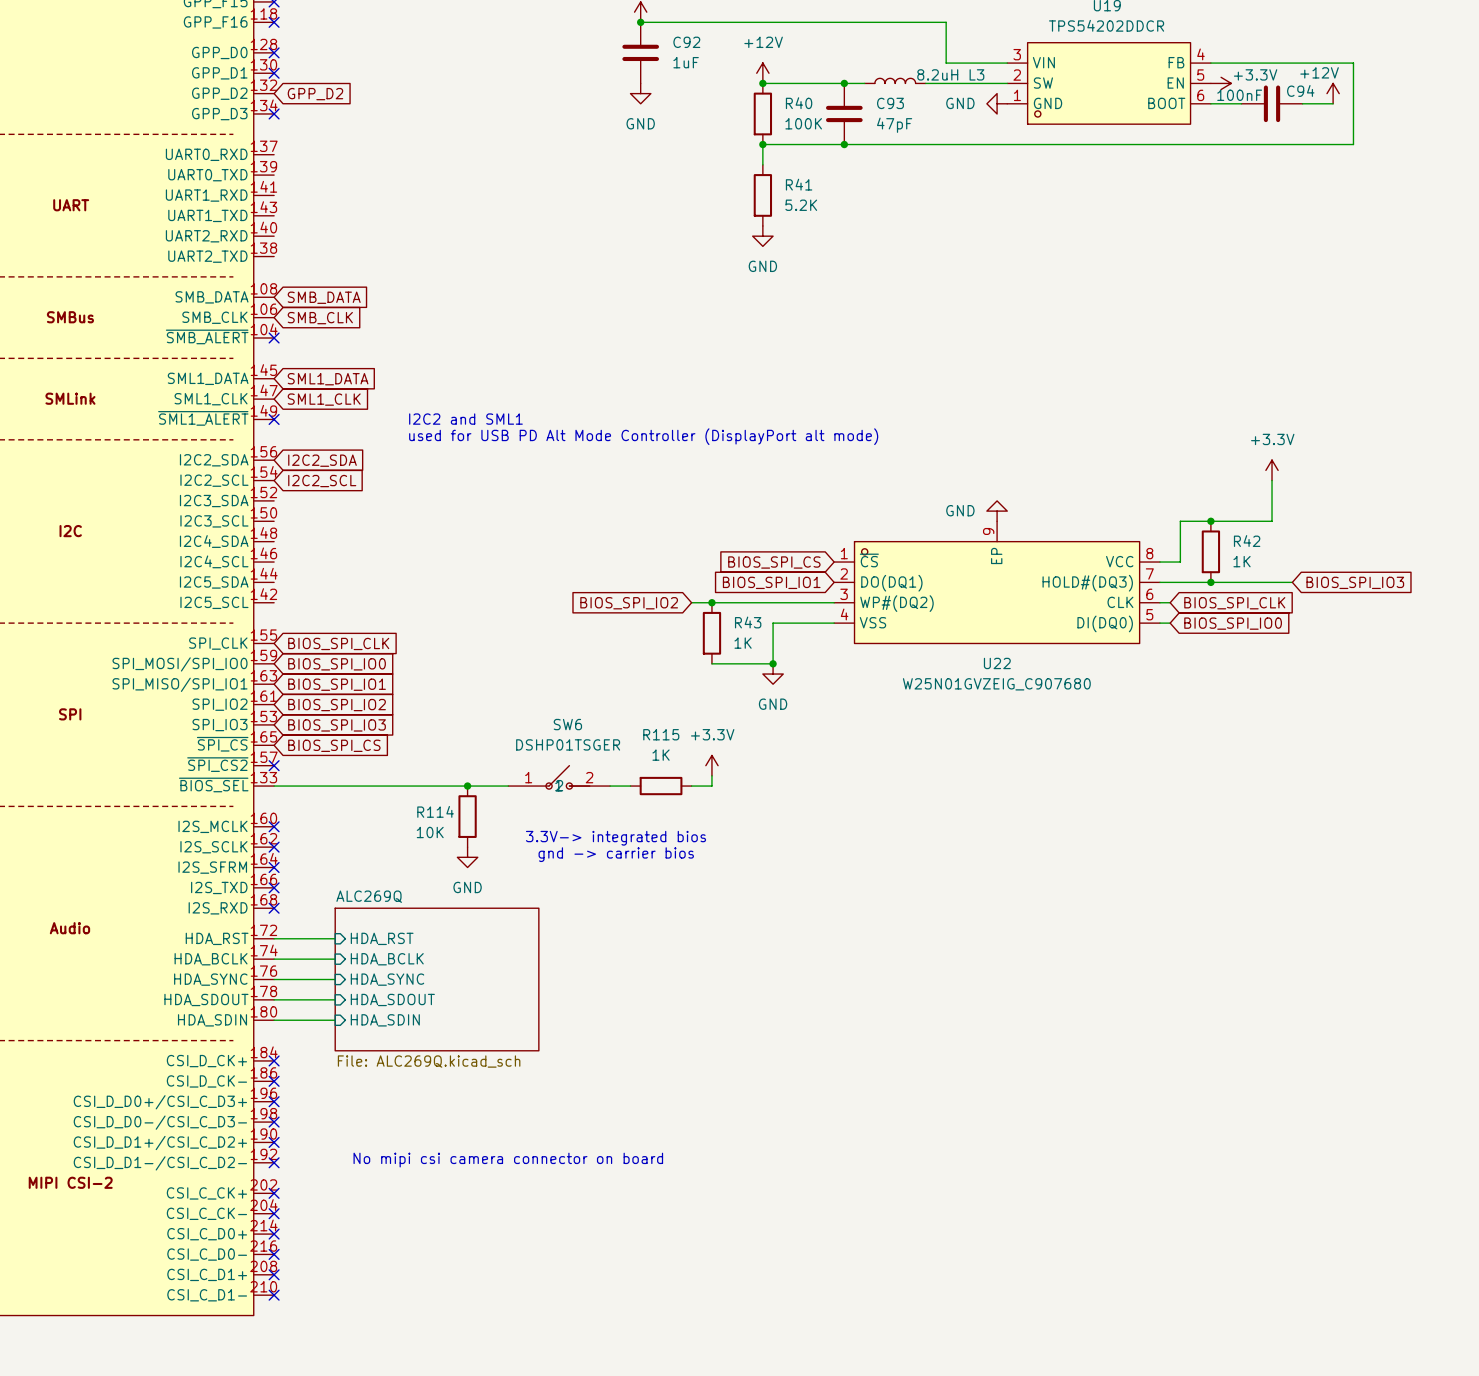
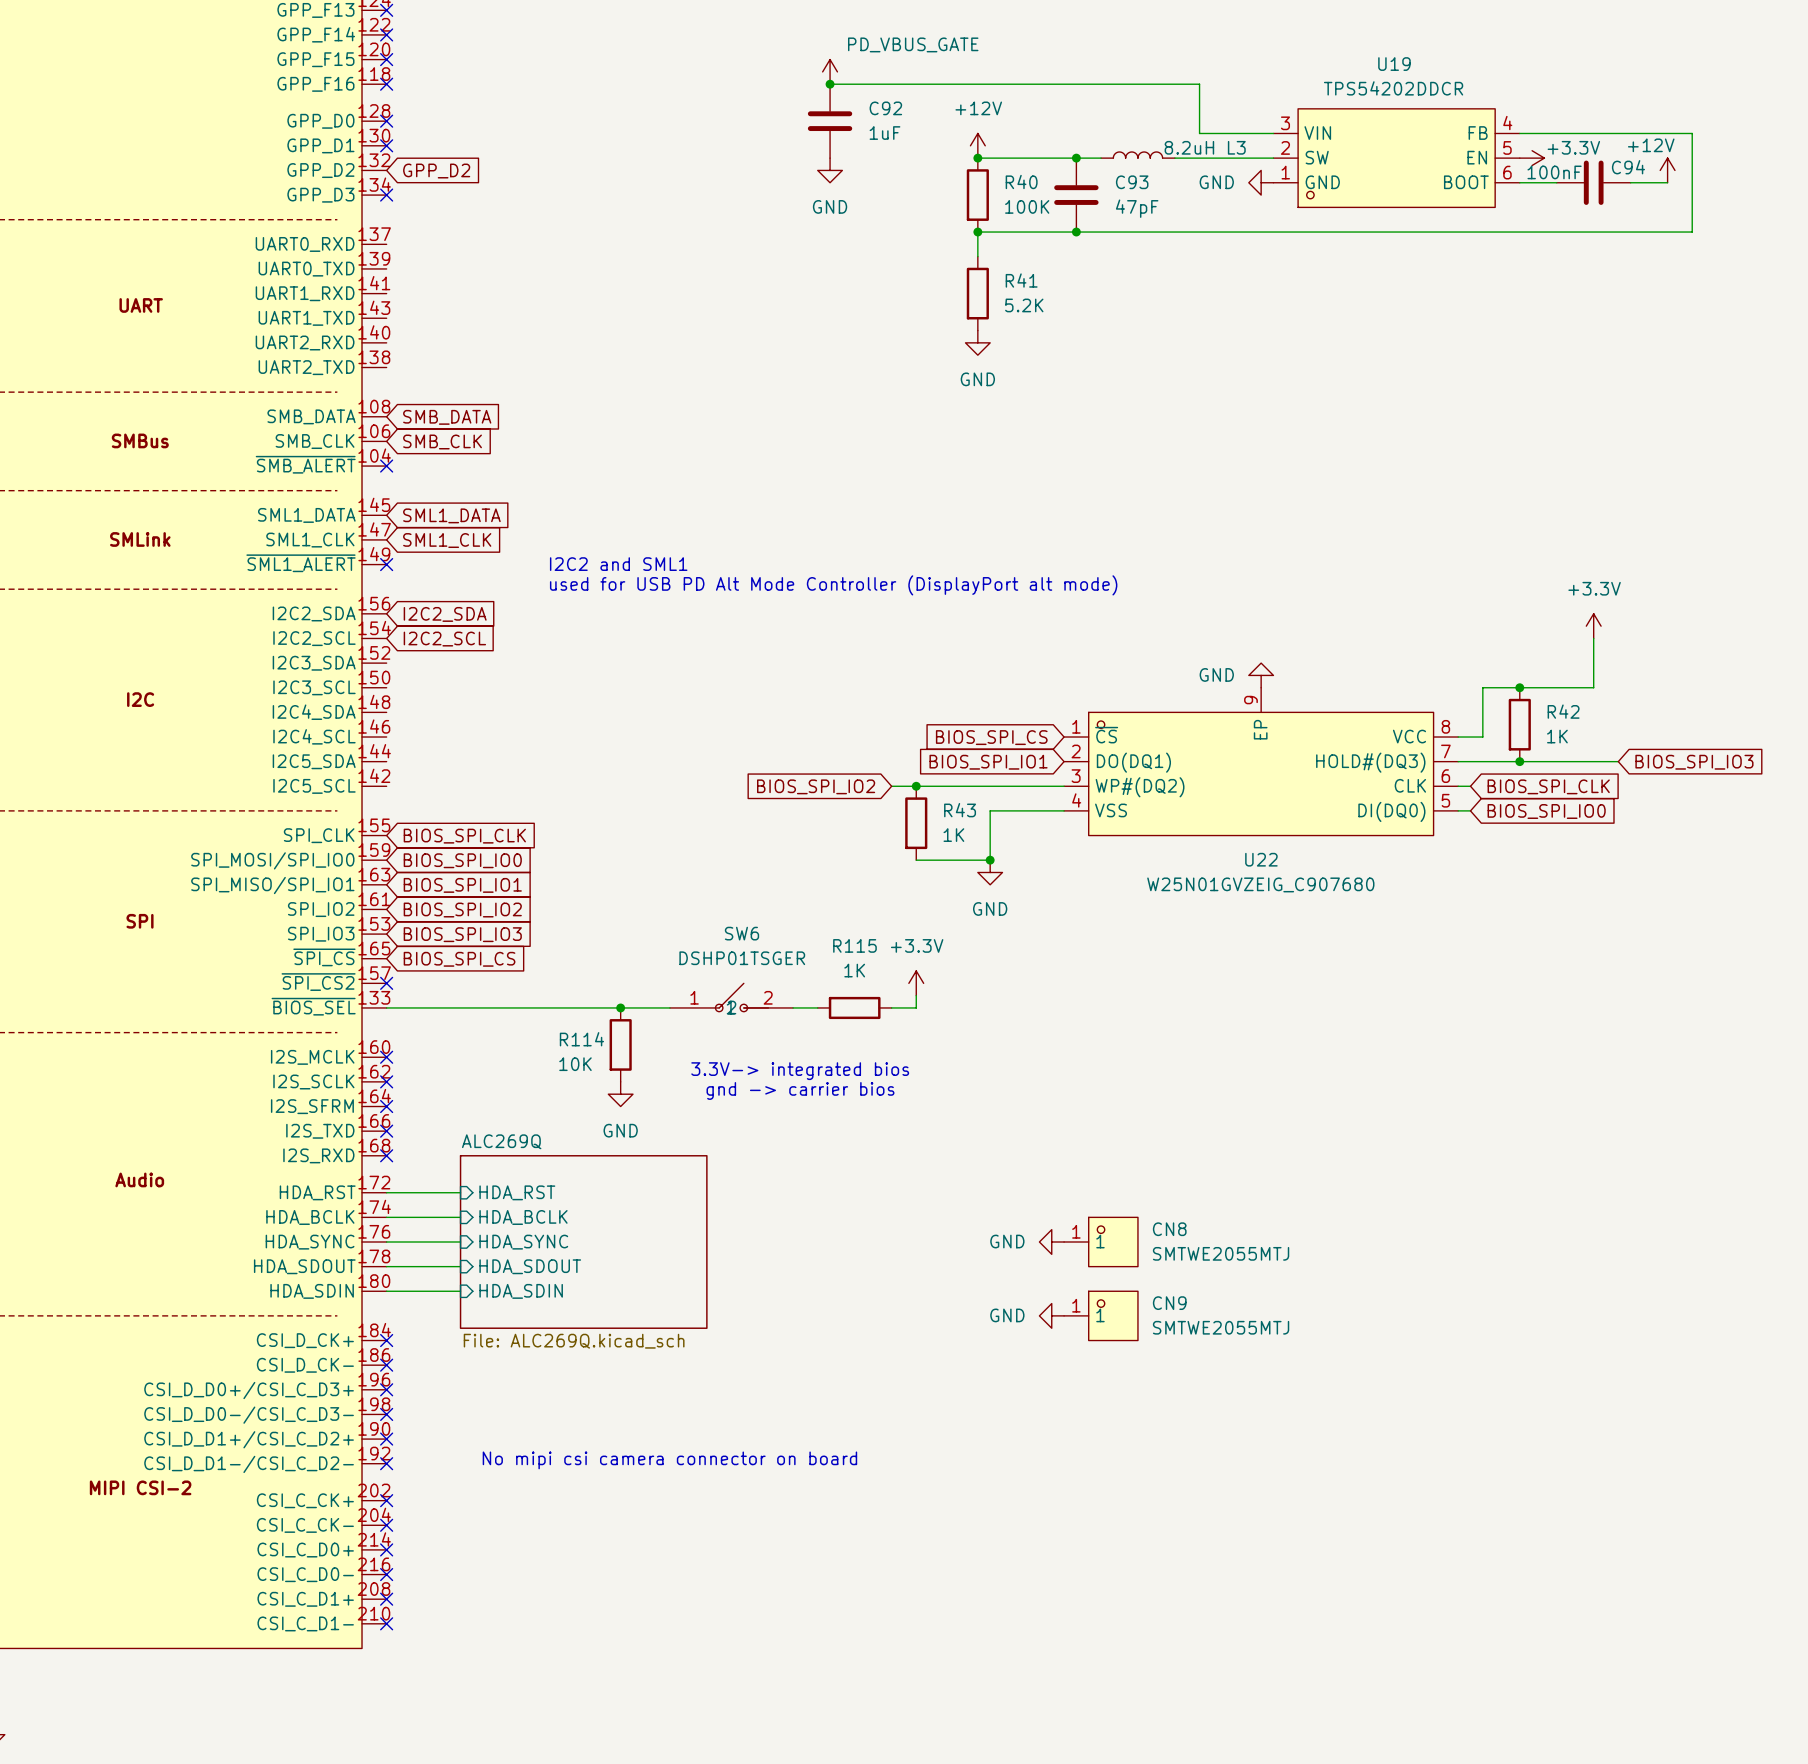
power symbol: none -> GND (1051, 1241)
CN8: none -> SMTWE2055MTJ (1101, 1241)
power symbol: none -> GND (1051, 1315)
CN9: none -> SMTWE2055MTJ (1101, 1315)

